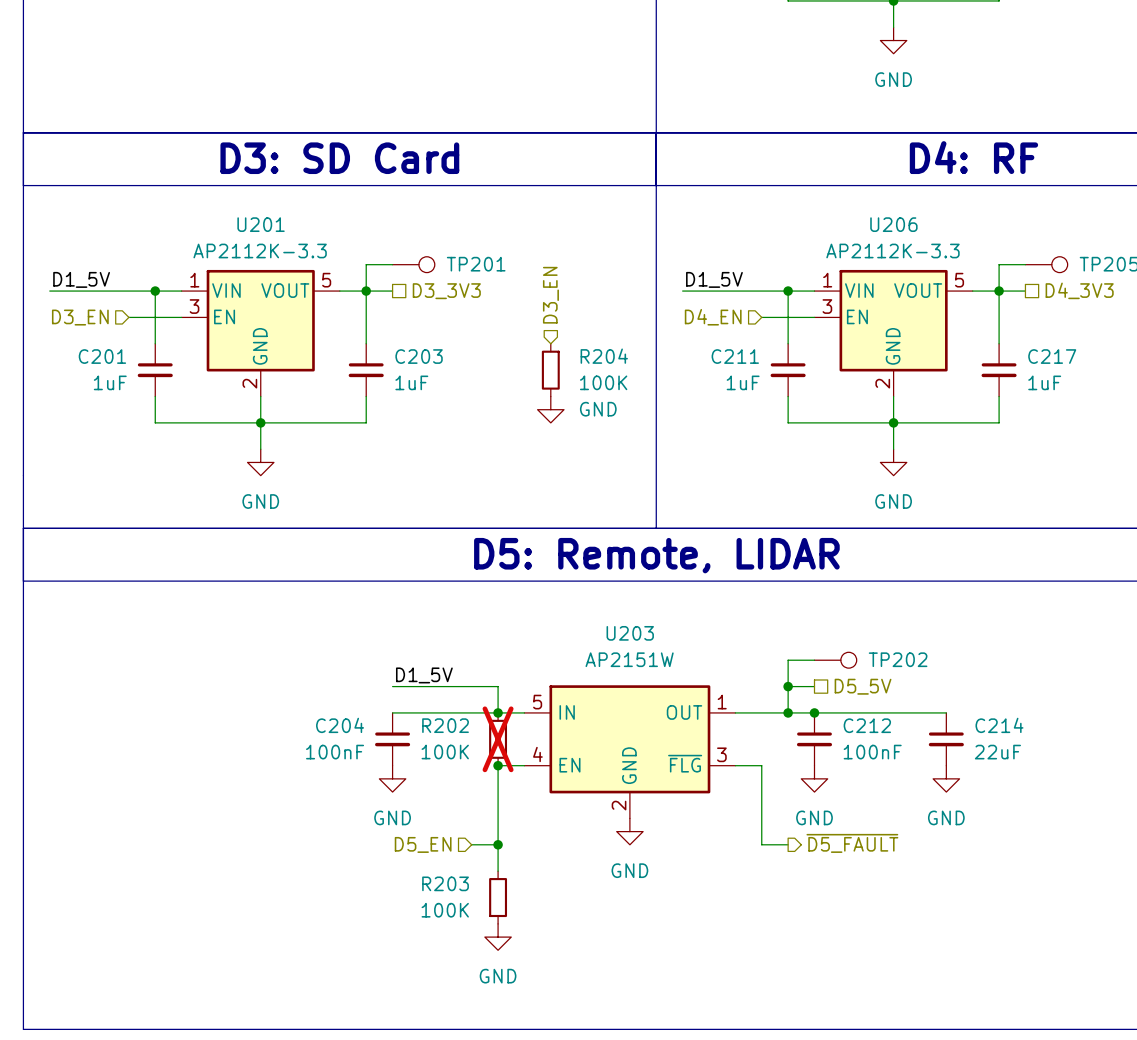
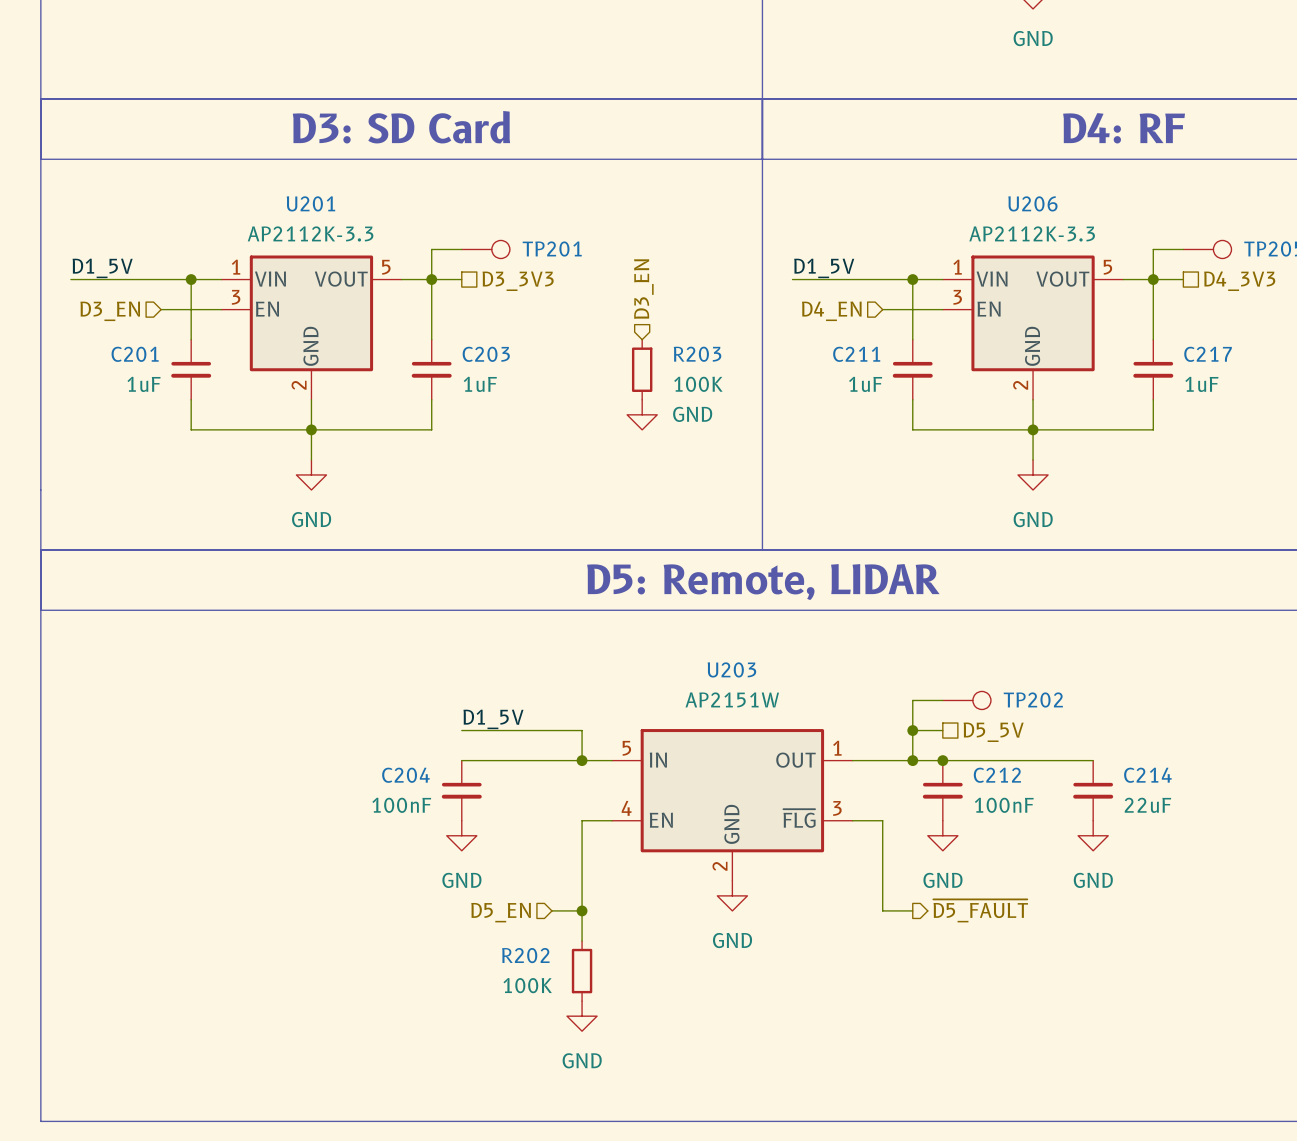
R204 name: R204 (604, 356) -> R203 (697, 354)
R202: 100K (498, 739) -> none
junction: (498, 765) -> none
R203 name: R203 (445, 883) -> R202 (525, 955)

